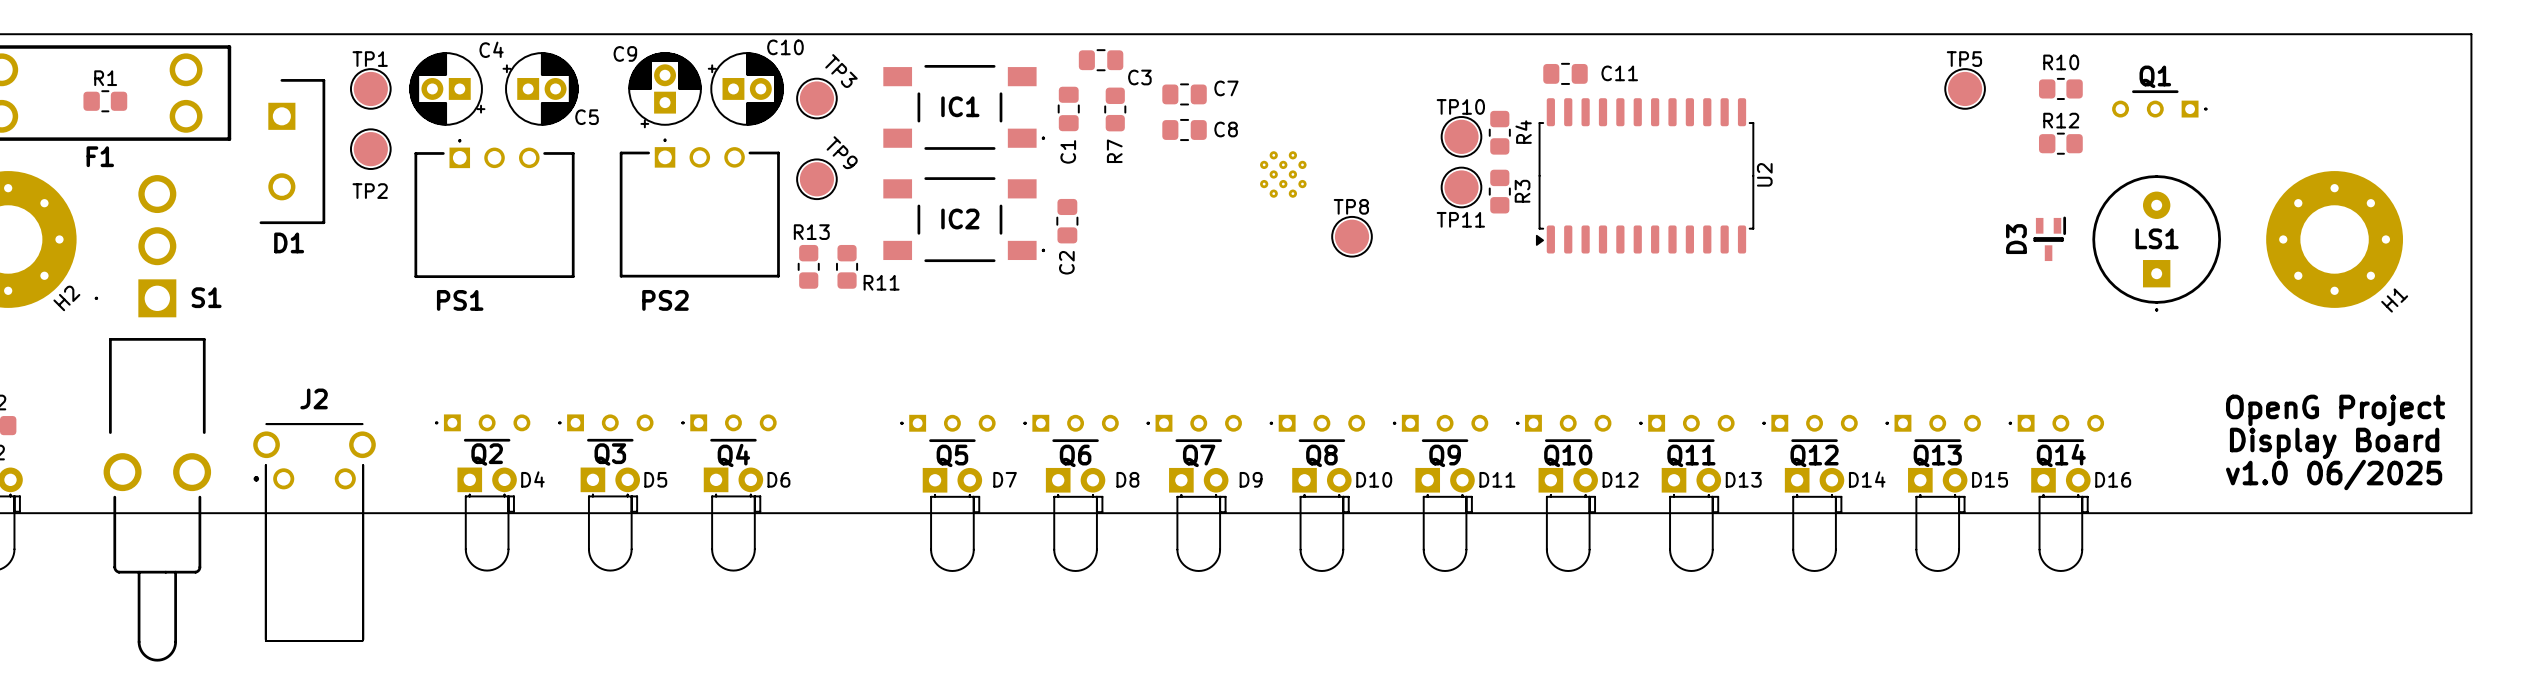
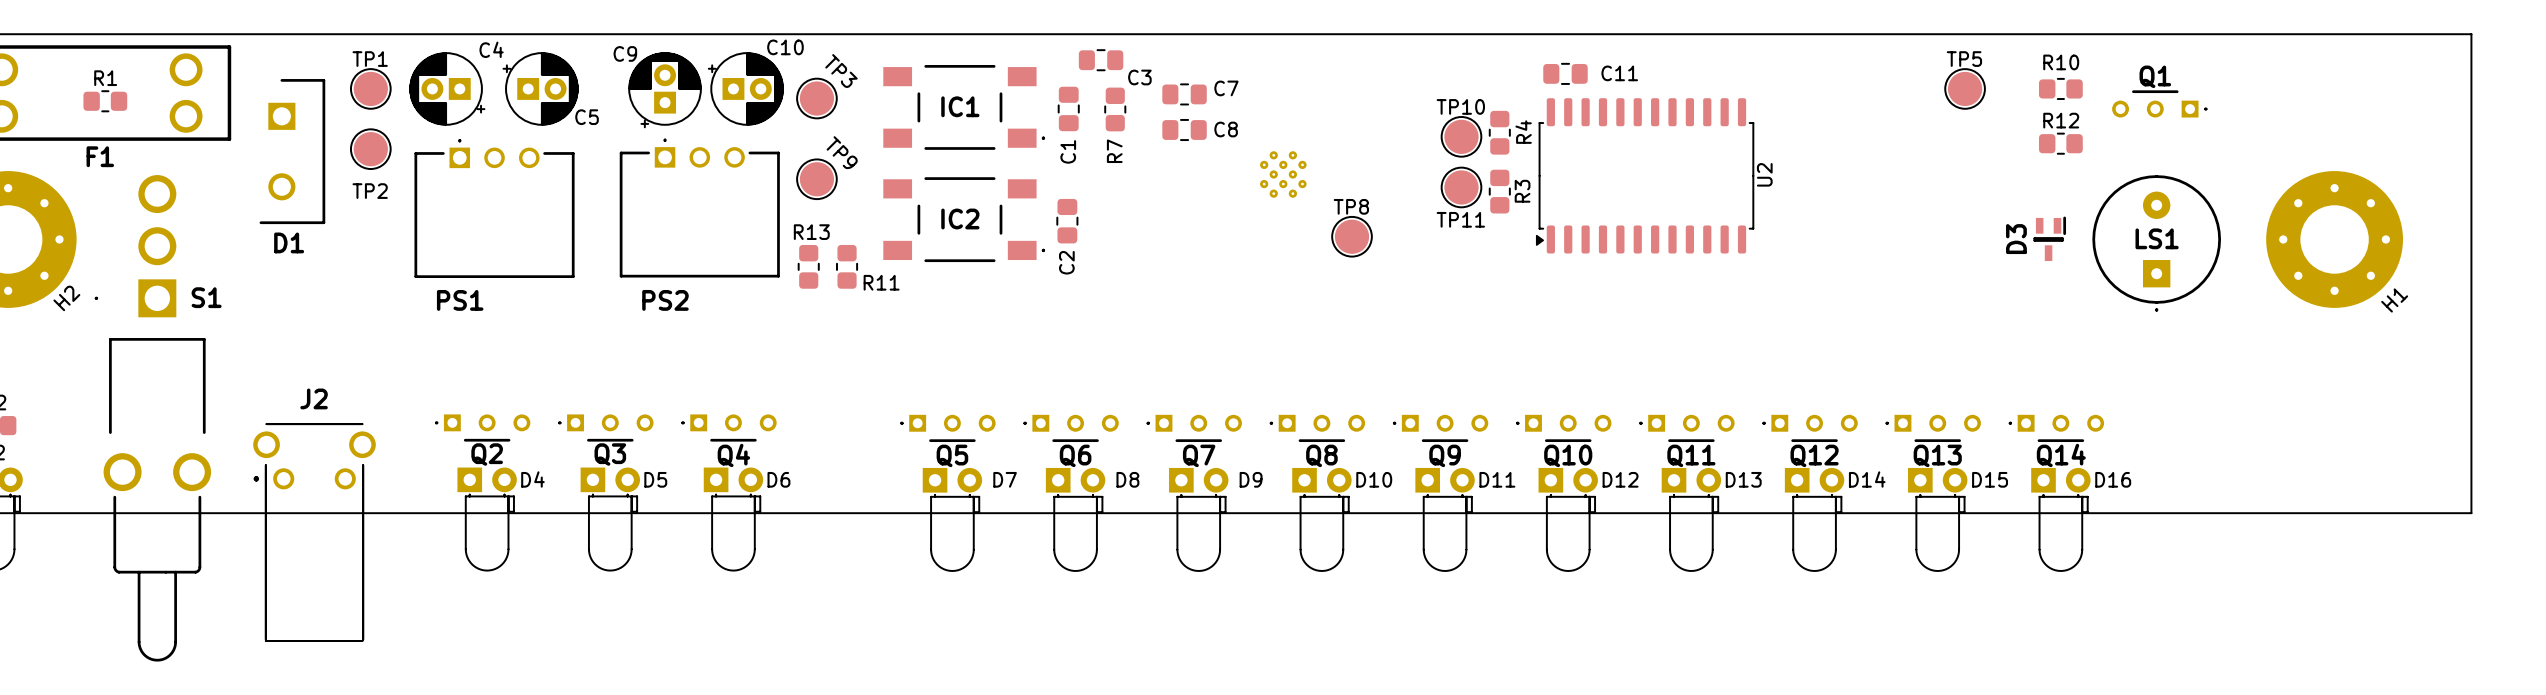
text: OpenG Project (2335, 410) -> none
text: Display Board (2334, 443) -> none
text: v1.0 06/2025 (2334, 474) -> none

